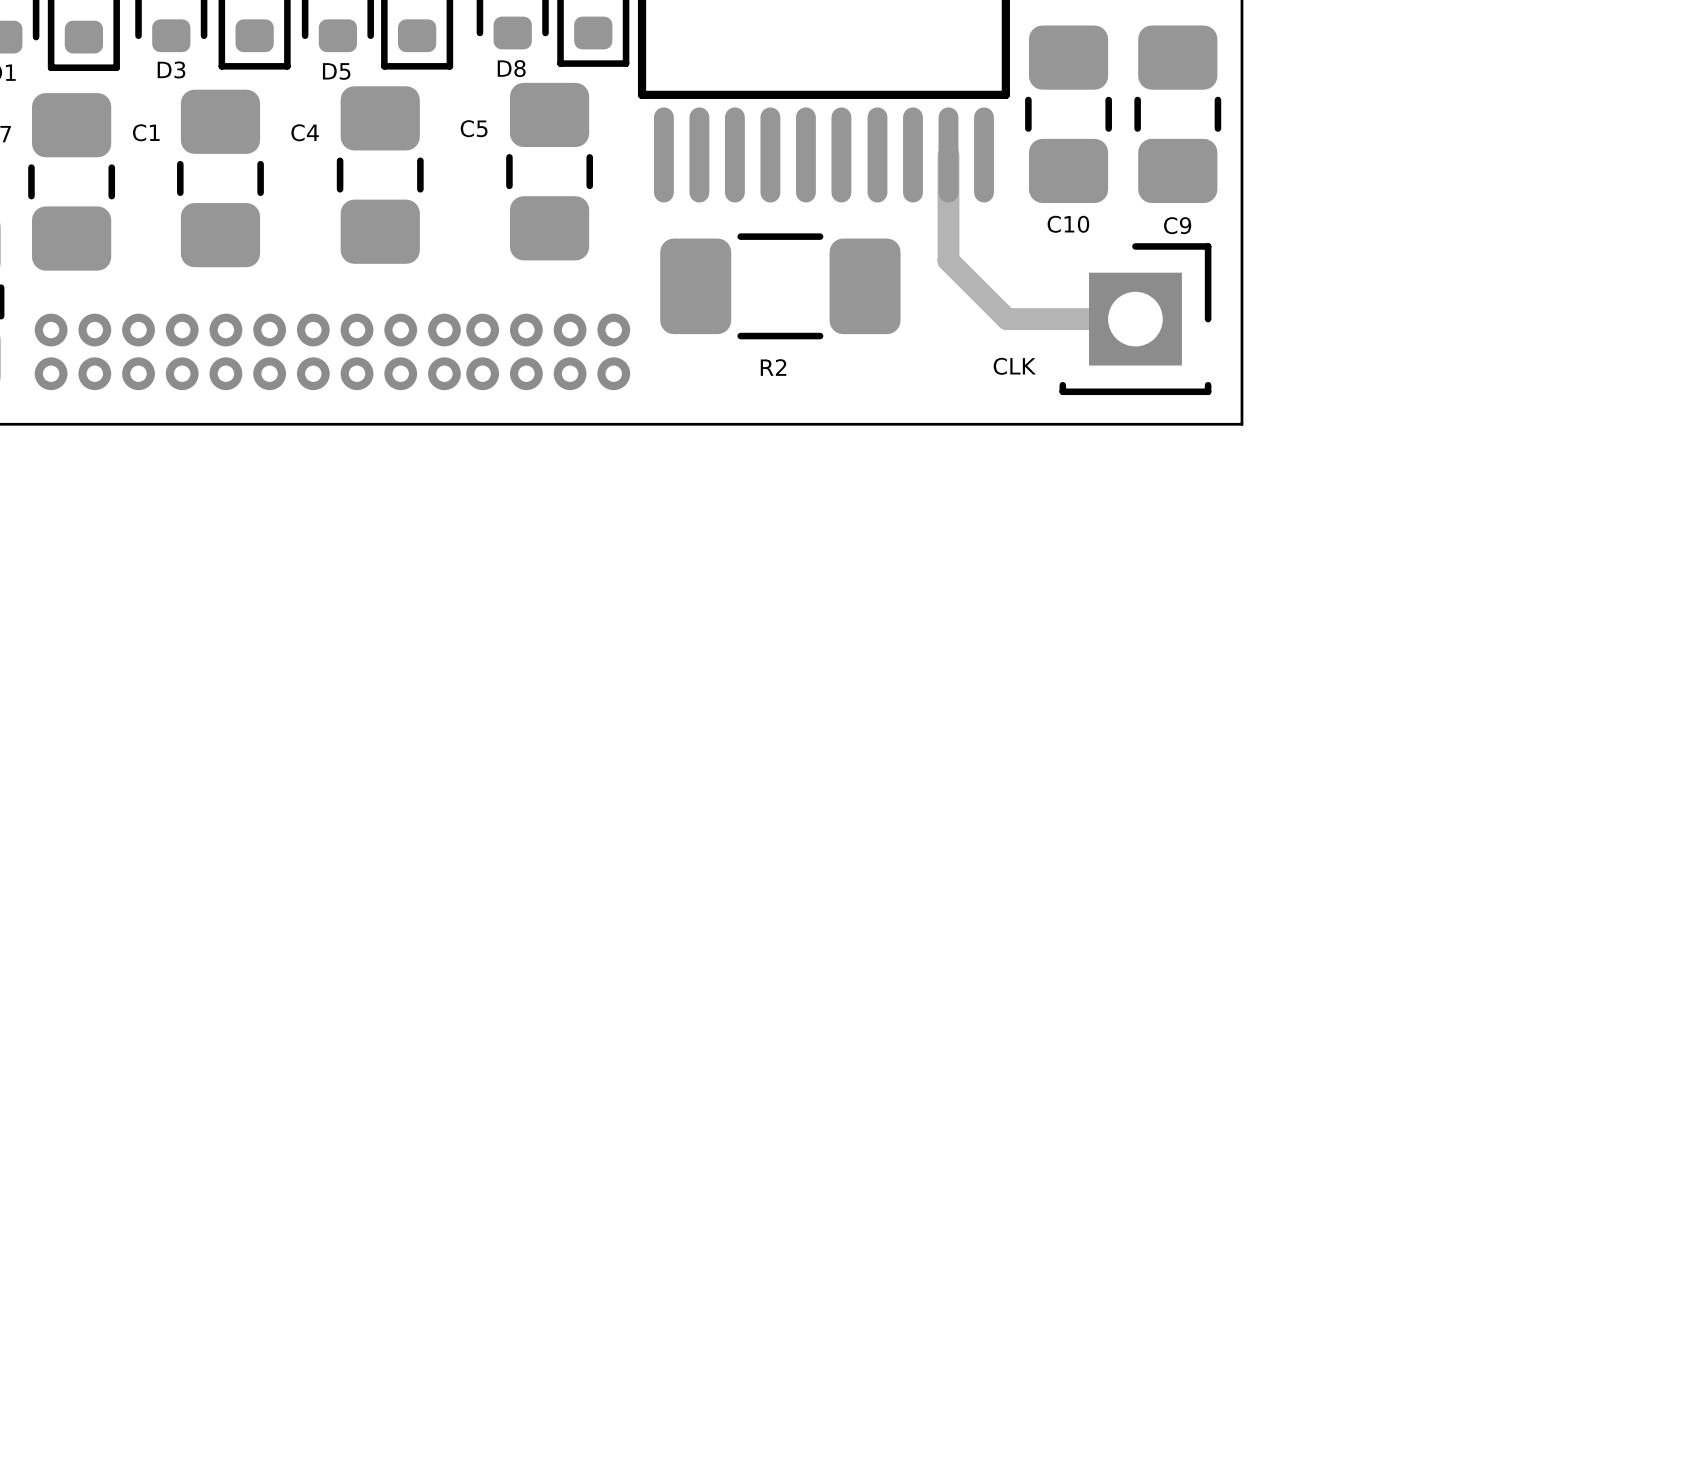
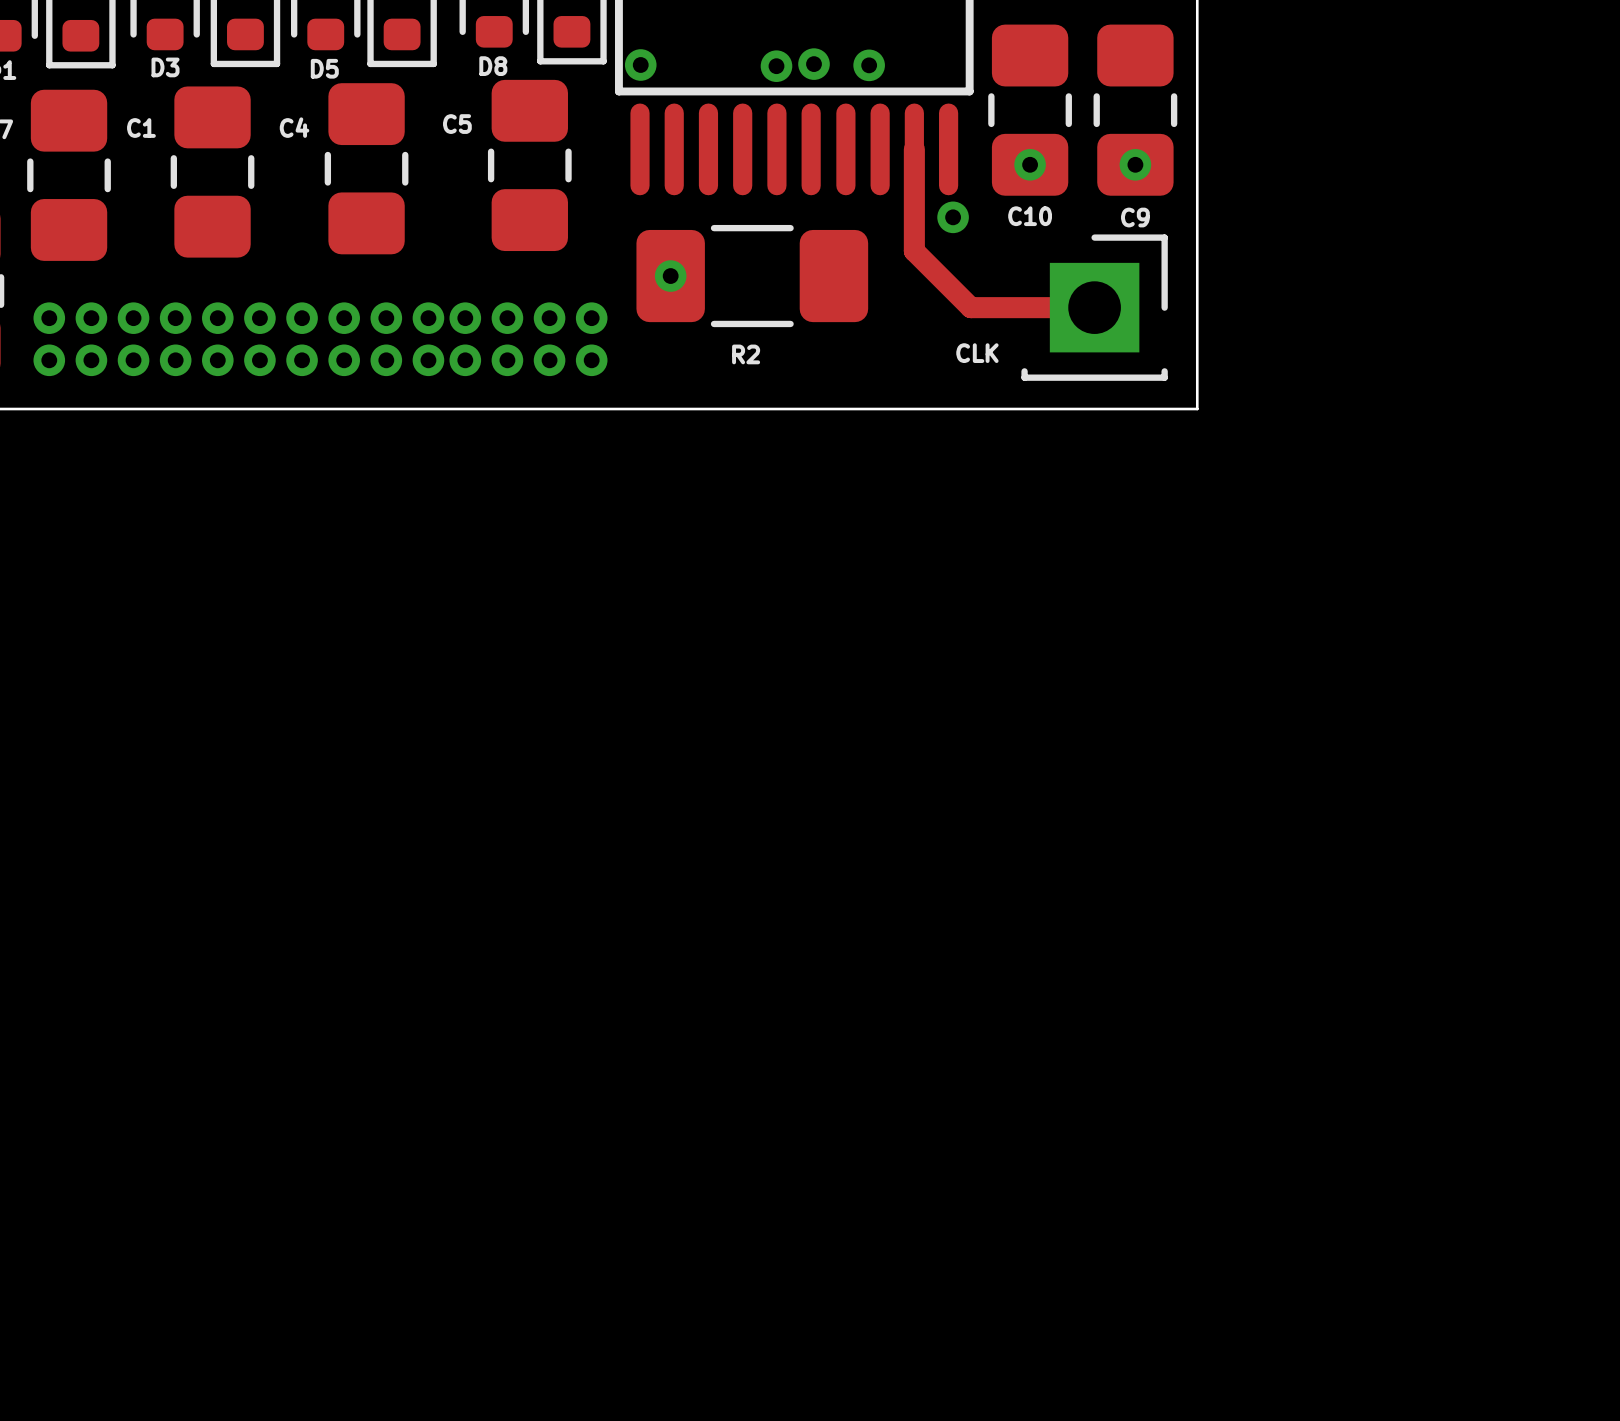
via: none -> (814, 64)
via: none -> (640, 64)
via: none -> (869, 65)
via: none -> (776, 66)
via: none -> (1030, 164)
via: none -> (1135, 164)
via: none -> (953, 217)
via: none -> (670, 276)

